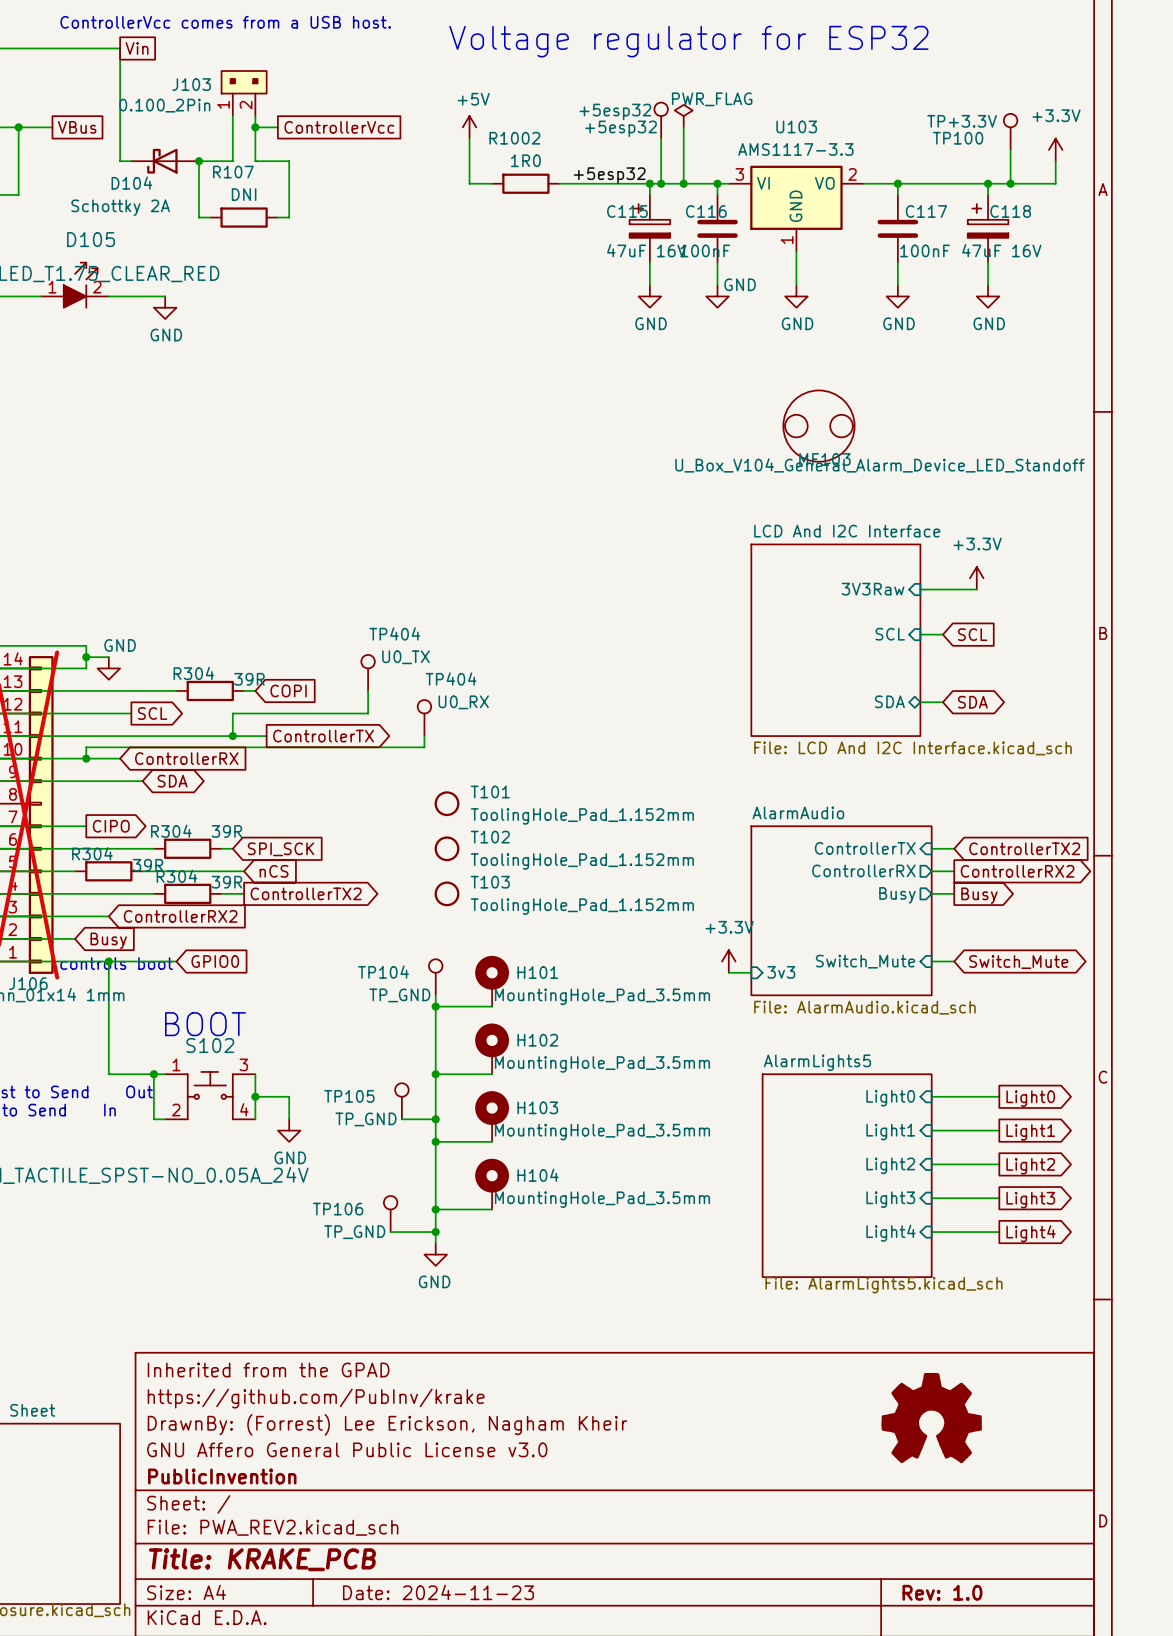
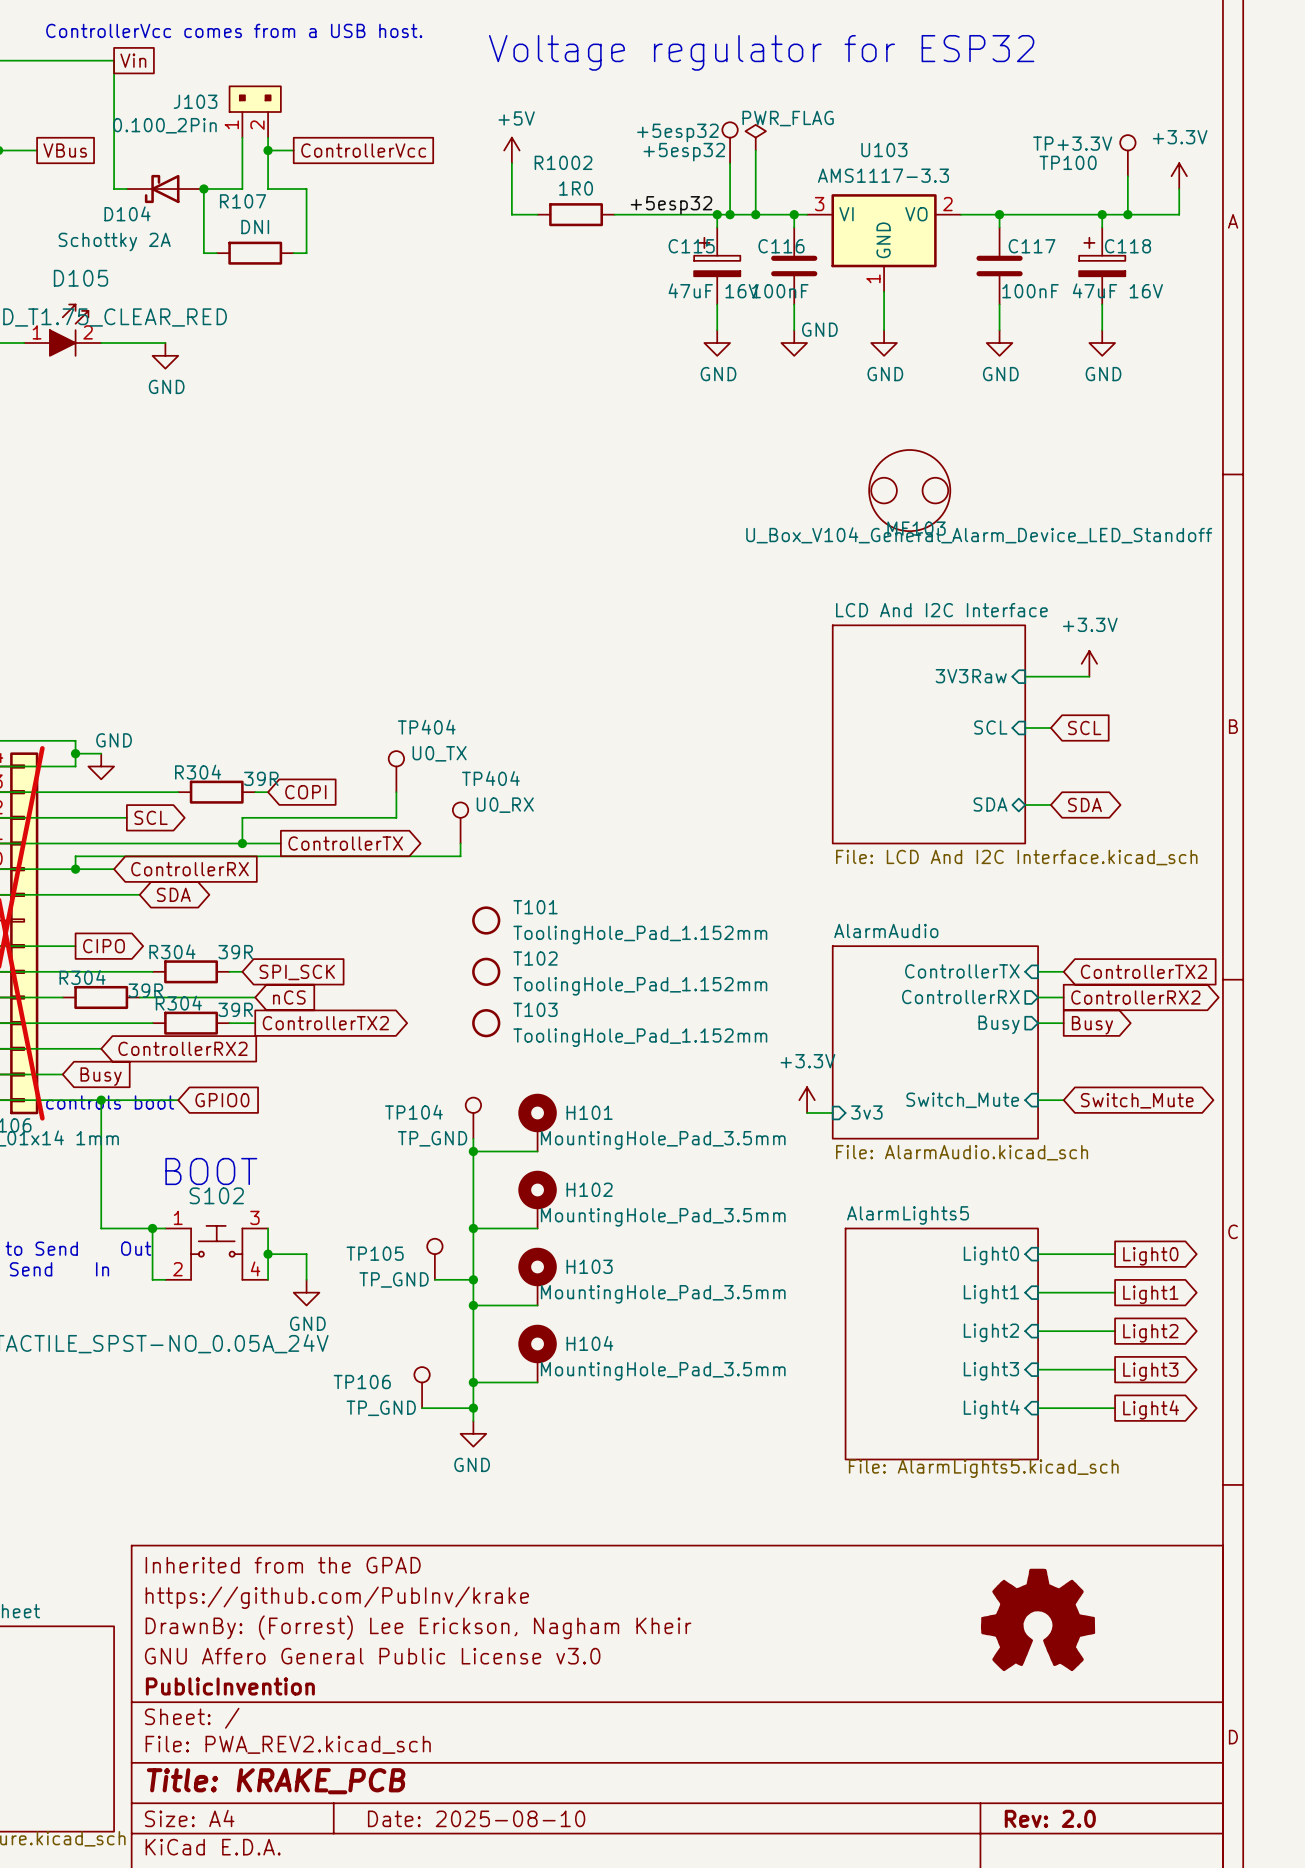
title block: Date: 2024-11-23 (438, 1592) -> Date: 2025-08-10 (476, 1818)
title block: Rev: 1.0 (942, 1592) -> Rev: 2.0 (1050, 1818)

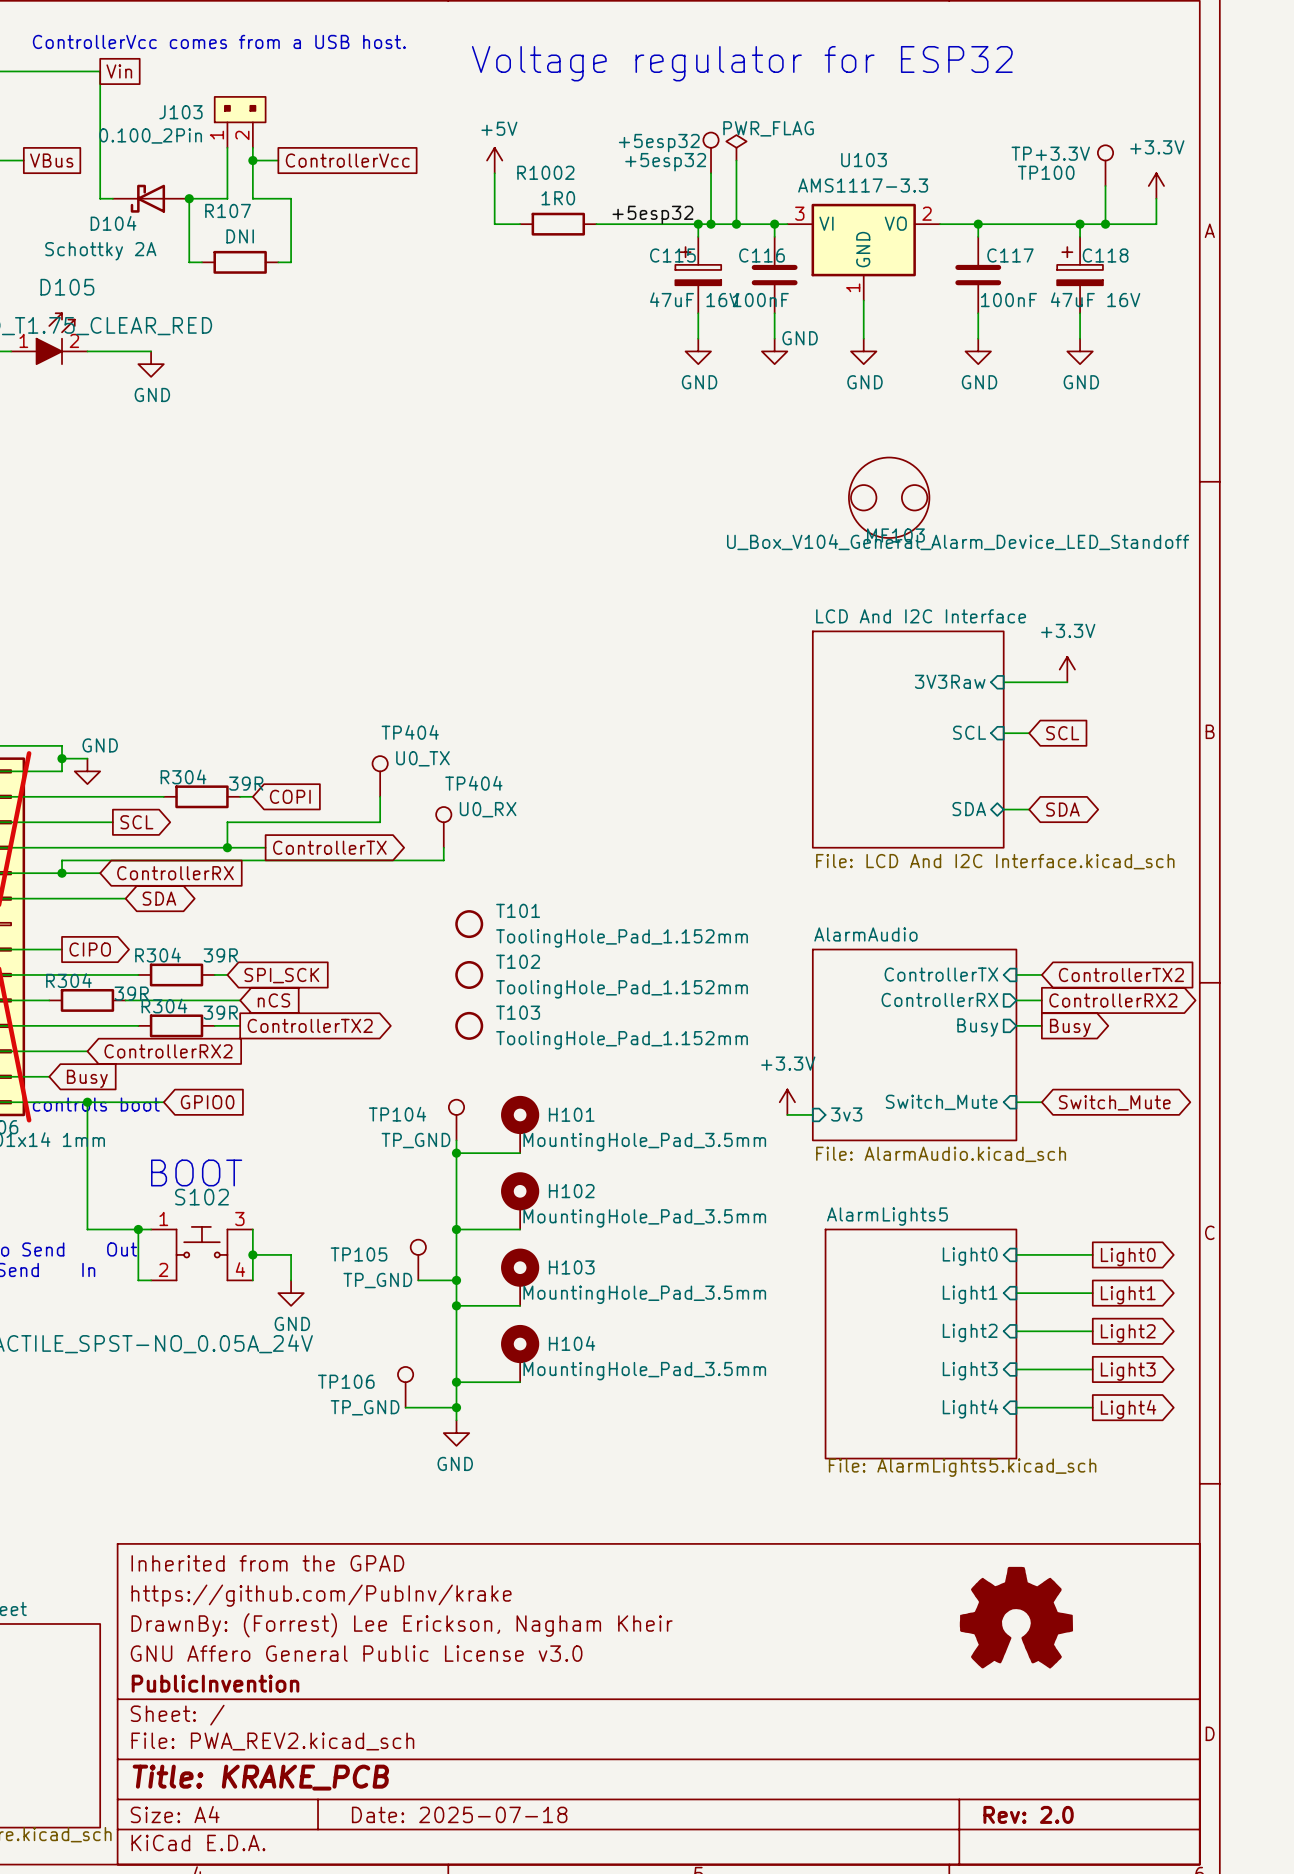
title block: Date: 2025-08-10 (476, 1818) -> Date: 2025-07-18 (459, 1814)

